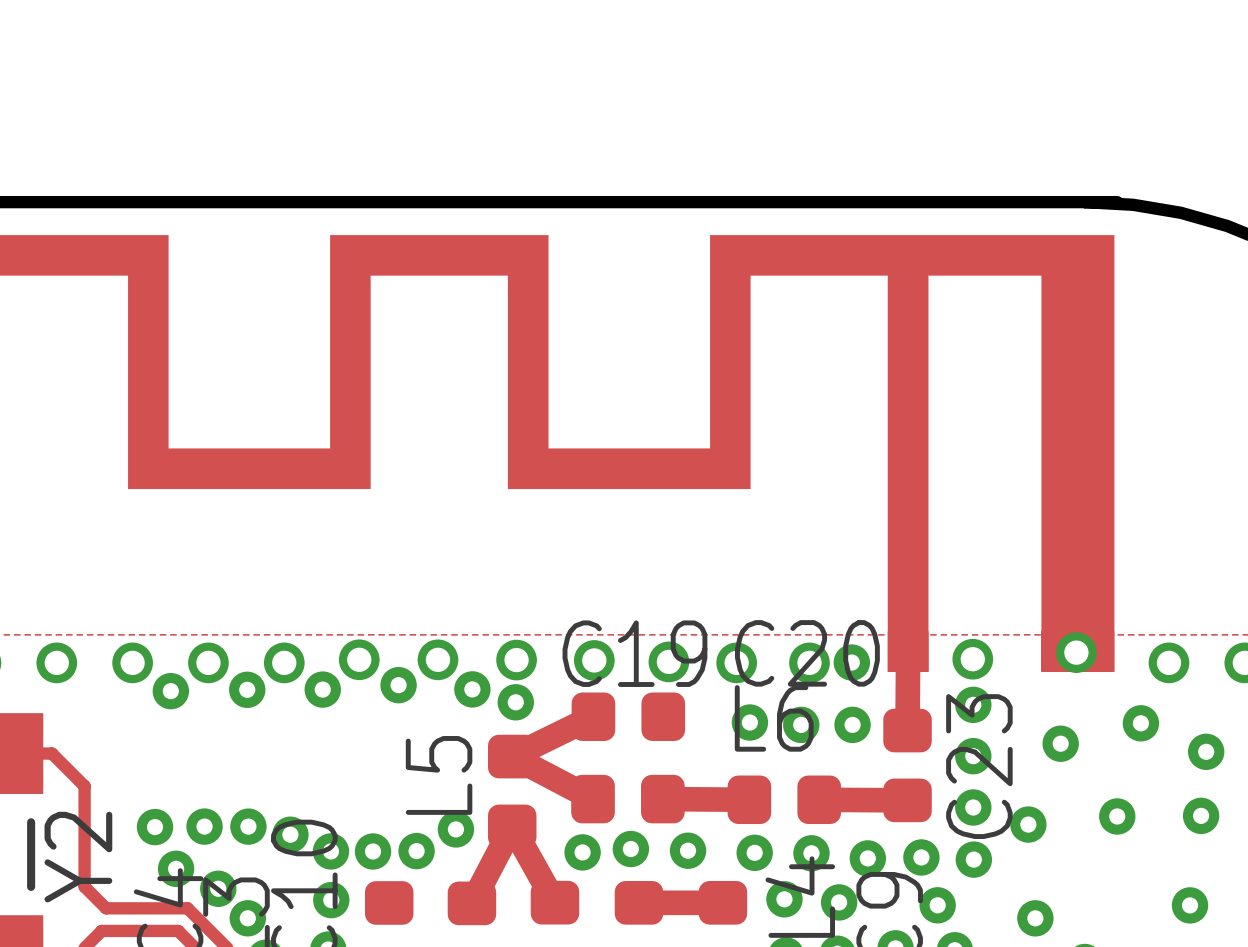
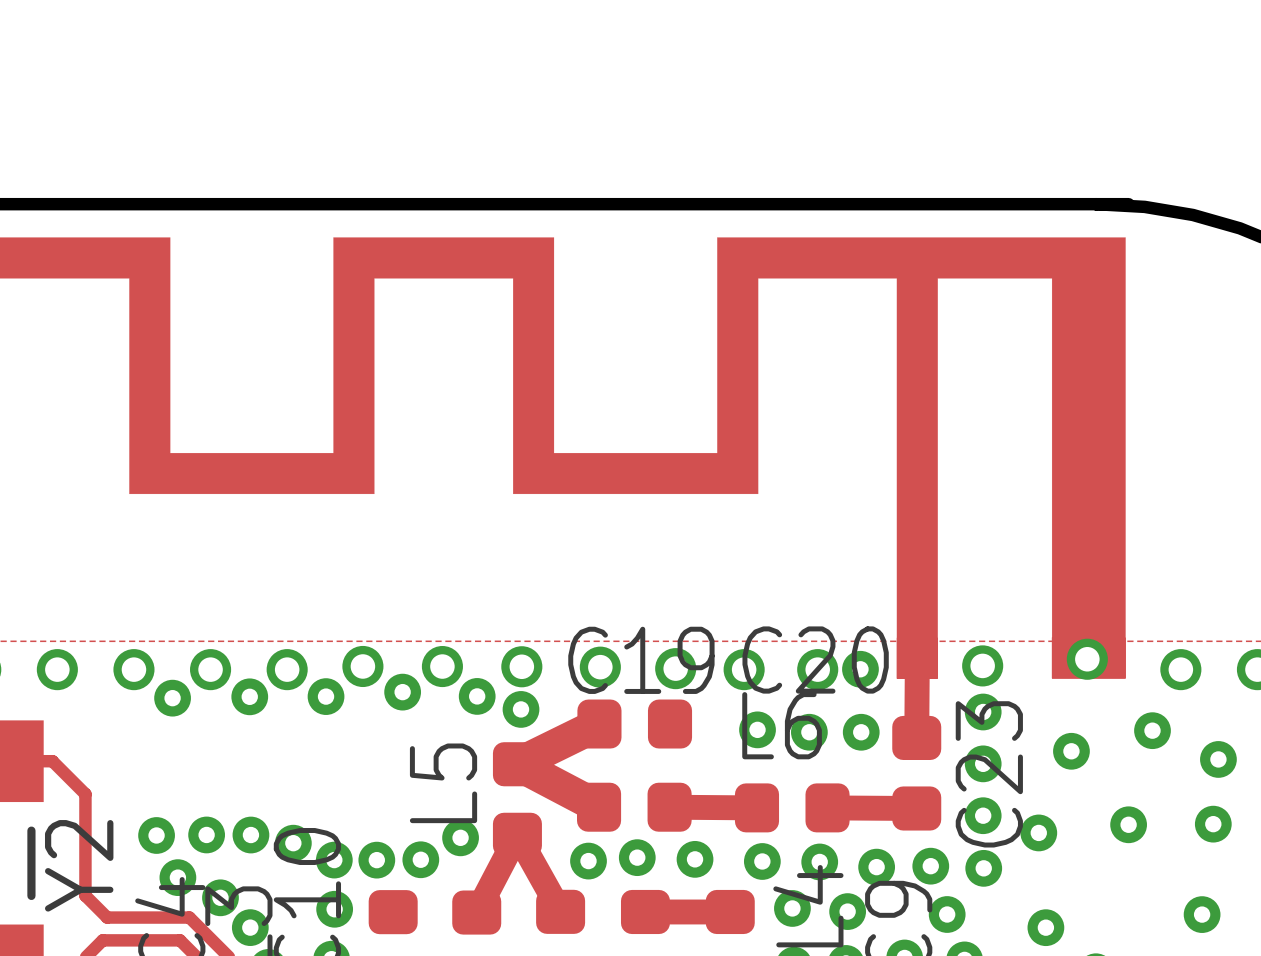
track width: thin (593, 716) (512, 756) (593, 799) -> thick (599, 724) (517, 764) (599, 807)

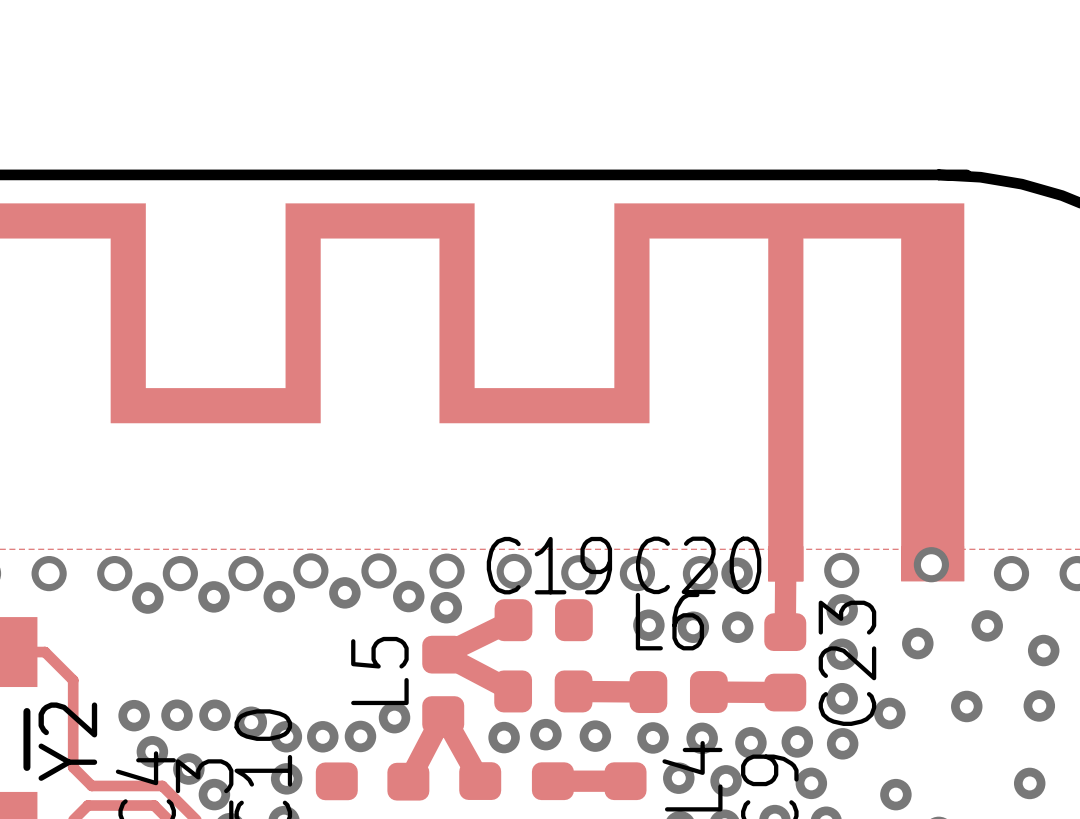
track width: thick (599, 724) (517, 764) (599, 807) -> thin (513, 620) (443, 654) (513, 691)

